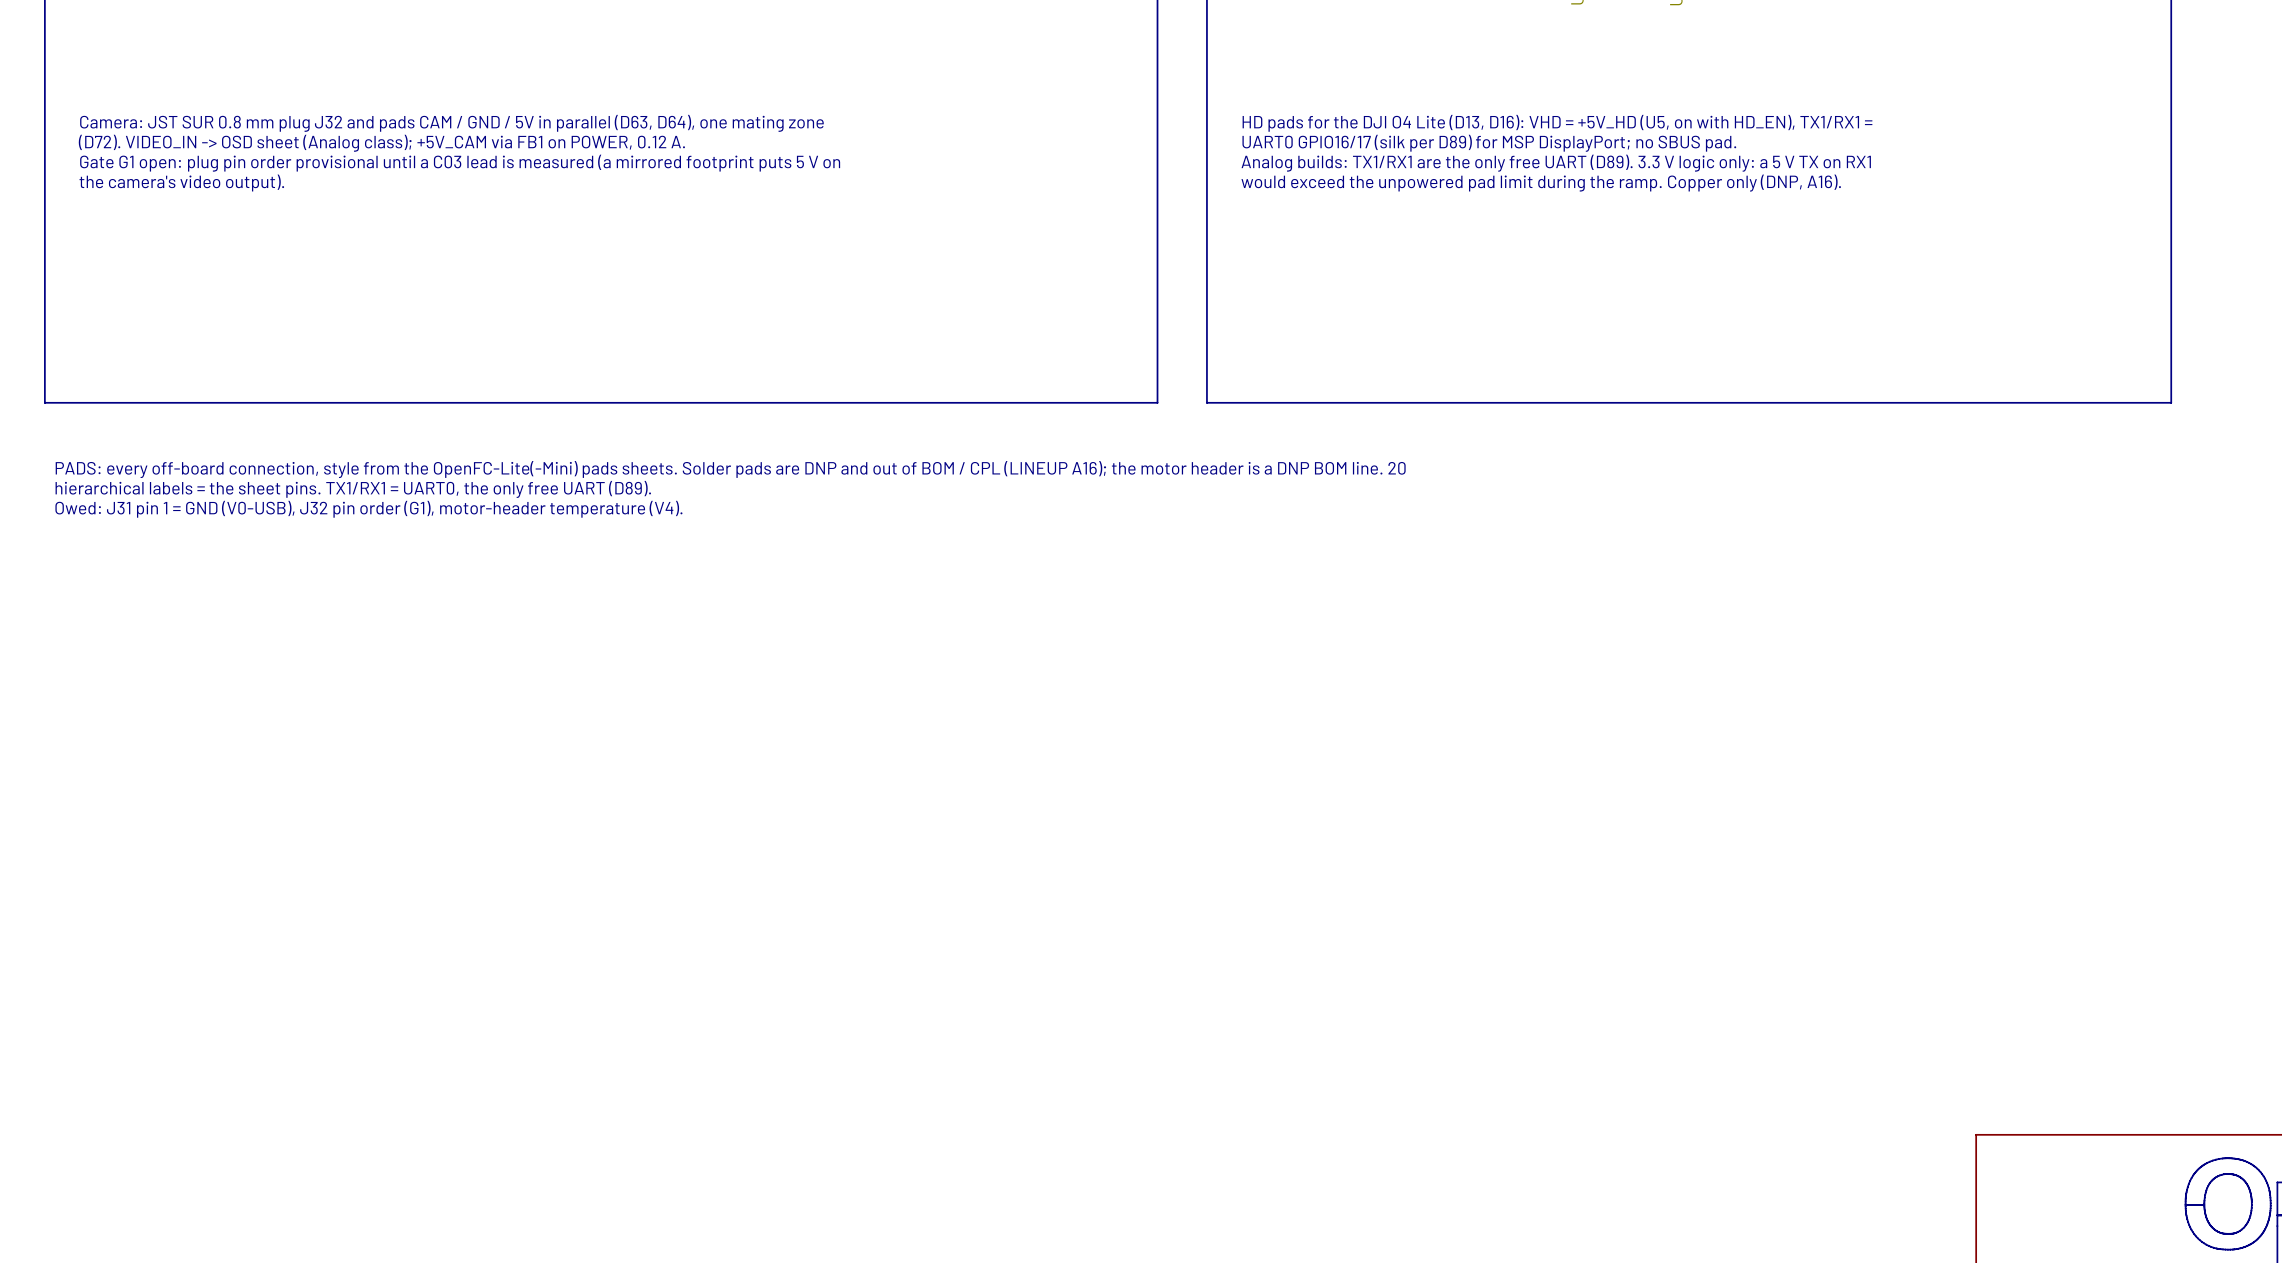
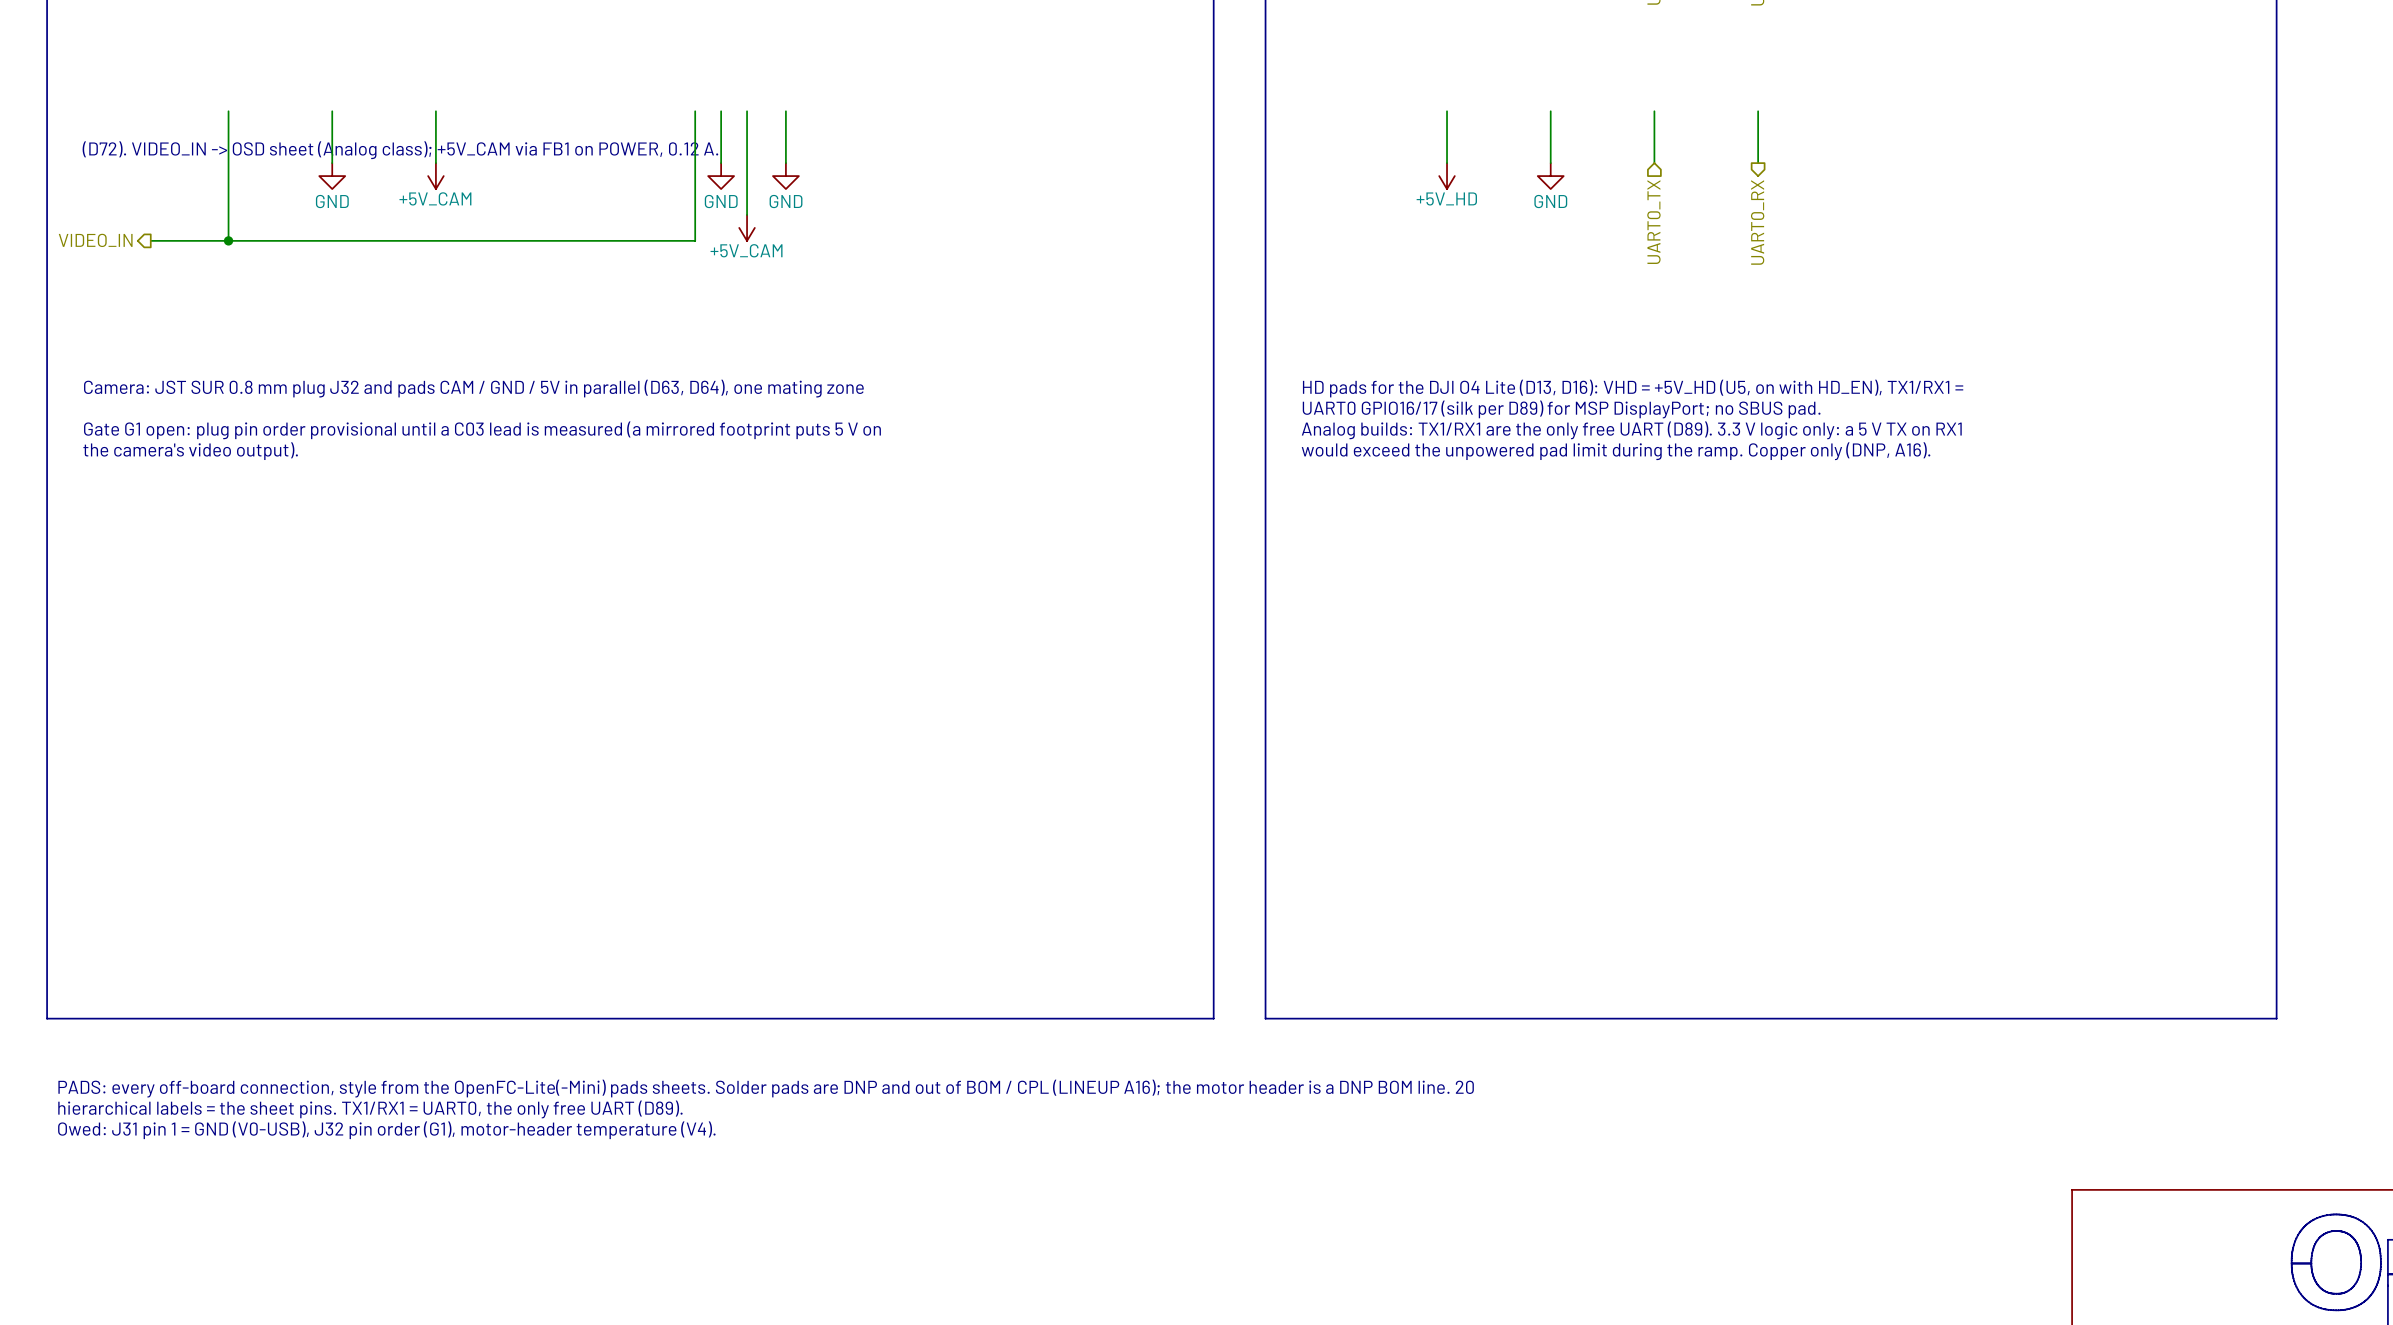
wire: none -> (228, 111) (228, 240)
wire: none -> (332, 111) (332, 163)
wire: none -> (435, 111) (435, 163)
wire: none -> (695, 111) (695, 240) (150, 240)
wire: none -> (721, 111) (721, 163)
wire: none -> (747, 111) (747, 214)
wire: none -> (785, 111) (785, 163)
wire: none -> (1447, 111) (1447, 163)
wire: none -> (1550, 111) (1550, 163)
wire: none -> (1654, 111) (1654, 163)
wire: none -> (1758, 111) (1758, 163)
text: Camera: JST SUR 0.8 mm plug J32 and pads CAM / GND / 5V in parallel (D63, D64), one mating zone (451, 123) -> none
text: HD pads for the DJI O4 Lite (D13, D16): VHD = +5V_HD (U5, on with HD_EN), TX1/RX1 = (1557, 123) -> none
text: UART0 GPIO16/17 (silk per D89) for MSP DisplayPort; no SBUS pad. (1489, 143) -> none
text: Gate G1 open: plug pin order provisional until a C03 lead is measured (a mirrored footprint puts 5 V on (460, 163) -> none
text: Analog builds: TX1/RX1 are the only free UART (D89). 3.3 V logic only: a 5 V TX on RX1 (1556, 163) -> none
power symbol: none -> GND (332, 176)
power symbol: none -> +5V_CAM (435, 176)
power symbol: none -> GND (721, 176)
power symbol: none -> GND (785, 176)
power symbol: none -> +5V_HD (1447, 176)
power symbol: none -> GND (1550, 176)
text: the camera's video output). (181, 183) -> none
text: would exceed the unpowered pad limit during the ramp. Copper only (DNP, A16). (1541, 183) -> none
hierarchical label: none -> UART0_TX (1653, 222)
hierarchical label: none -> UART0_RX (1757, 222)
power symbol: none -> +5V_CAM (747, 227)
hierarchical label: none -> VIDEO_IN (95, 240)
junction: none -> (228, 240)
text: none -> Camera: JST SUR 0.8 mm plug J32 and pads CAM / GND / 5V in parallel (D63, D64), one mating zone (473, 388)
text: none -> HD pads for the DJI O4 Lite (D13, D16): VHD = +5V_HD (U5, on with HD_EN), TX1/RX1 = (1633, 388)
text: none -> UART0 GPIO16/17 (silk per D89) for MSP DisplayPort; no SBUS pad. (1561, 409)
line: (44, 402) (1157, 402) -> (47, 422) (47, 1018) (1213, 1018) (1213, 422)
line: (1206, 402) (2171, 402) -> (1265, 422) (1265, 1018) (2276, 1018) (2276, 422)
text: none -> Gate G1 open: plug pin order provisional until a C03 lead is measured (a mirrored footprint puts 5 V on (482, 430)
text: none -> Analog builds: TX1/RX1 are the only free UART (D89). 3.3 V logic only: a 5 V TX on RX1 (1631, 430)
text: none -> the camera's video output). (190, 451)
text: none -> would exceed the unpowered pad limit during the ramp. Copper only (DNP, A16). (1616, 451)
text: PADS: every off-board connection, style from the OpenFC-Lite(-Mini) pads sheets. Solder pads are DNP and out of BOM / CPL (LINEUP A16); the motor header is a DNP BOM line. 20 (730, 469) -> none
text: hierarchical labels = the sheet pins. TX1/RX1 = UART0, the only free UART (D89). (353, 489) -> none
text: Owed: J31 pin 1 = GND (V0-USB), J32 pin order (G1), motor-header temperature (V4). (368, 509) -> none
text: none -> PADS: every off-board connection, style from the OpenFC-Lite(-Mini) pads sheets. Solder pads are DNP and out of BOM / CPL (LINEUP A16); the motor header is a DNP BOM line. 20 (766, 1088)
text: none -> hierarchical labels = the sheet pins. TX1/RX1 = UART0, the only free UART (D89). (370, 1109)
text: none -> Owed: J31 pin 1 = GND (V0-USB), J32 pin order (G1), motor-header temperature (V4). (386, 1130)

